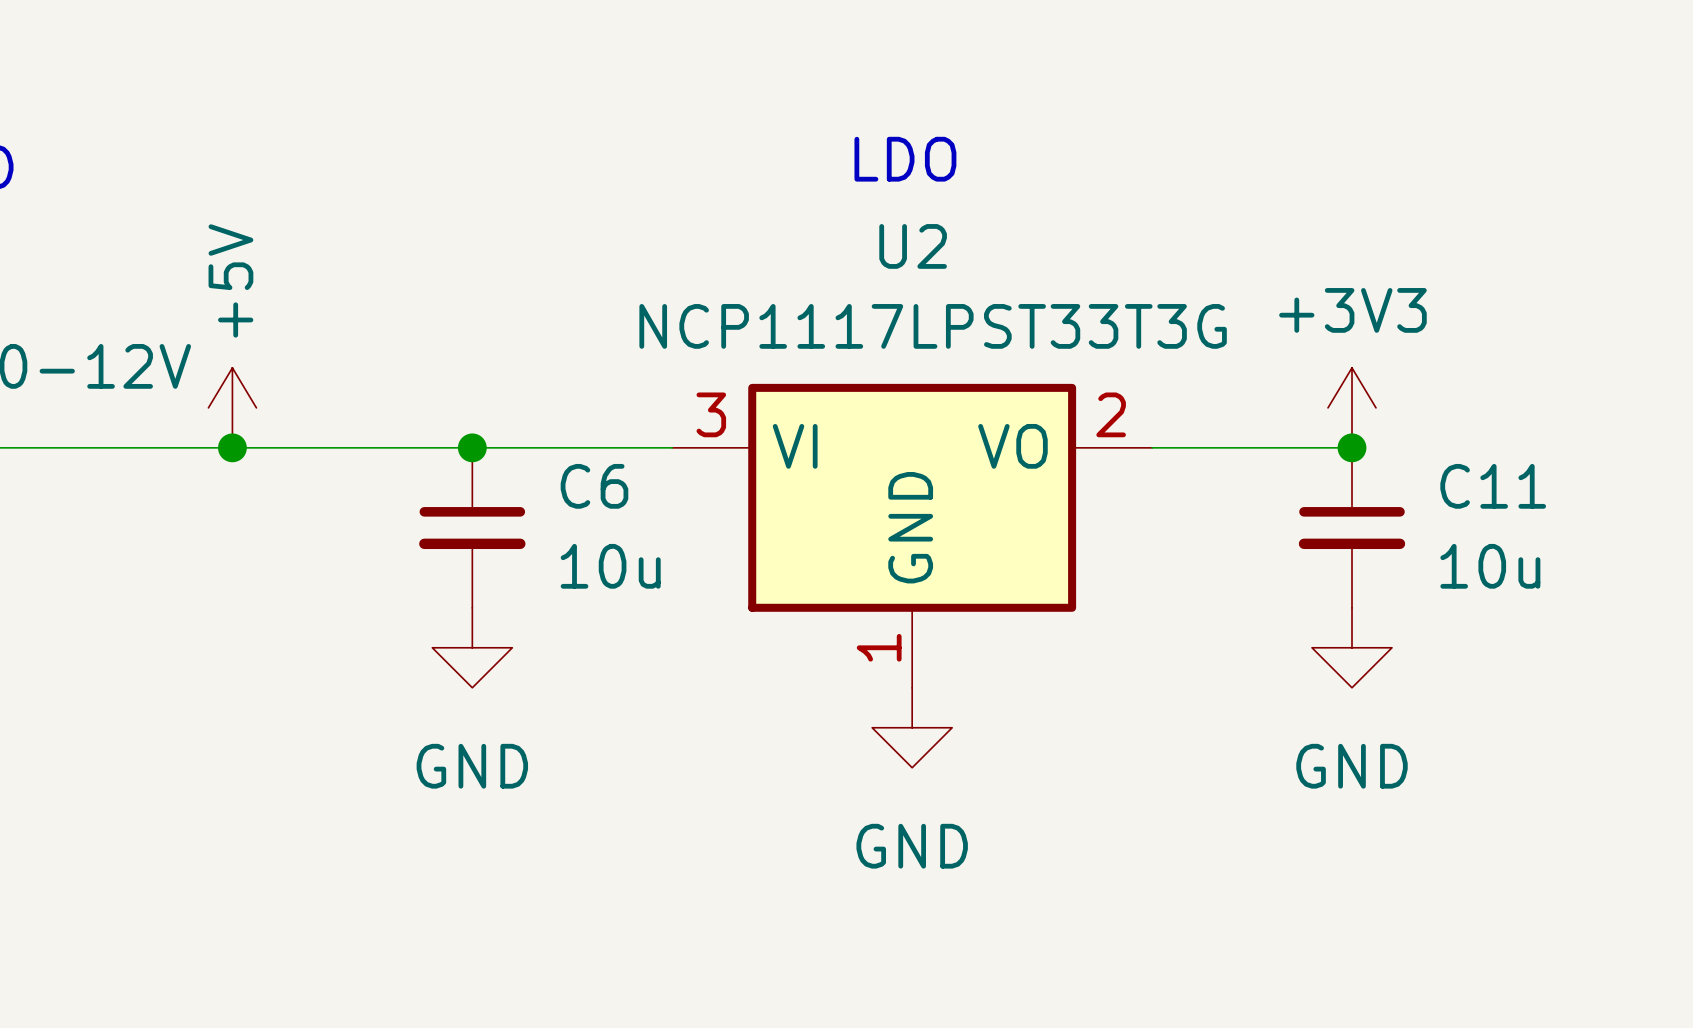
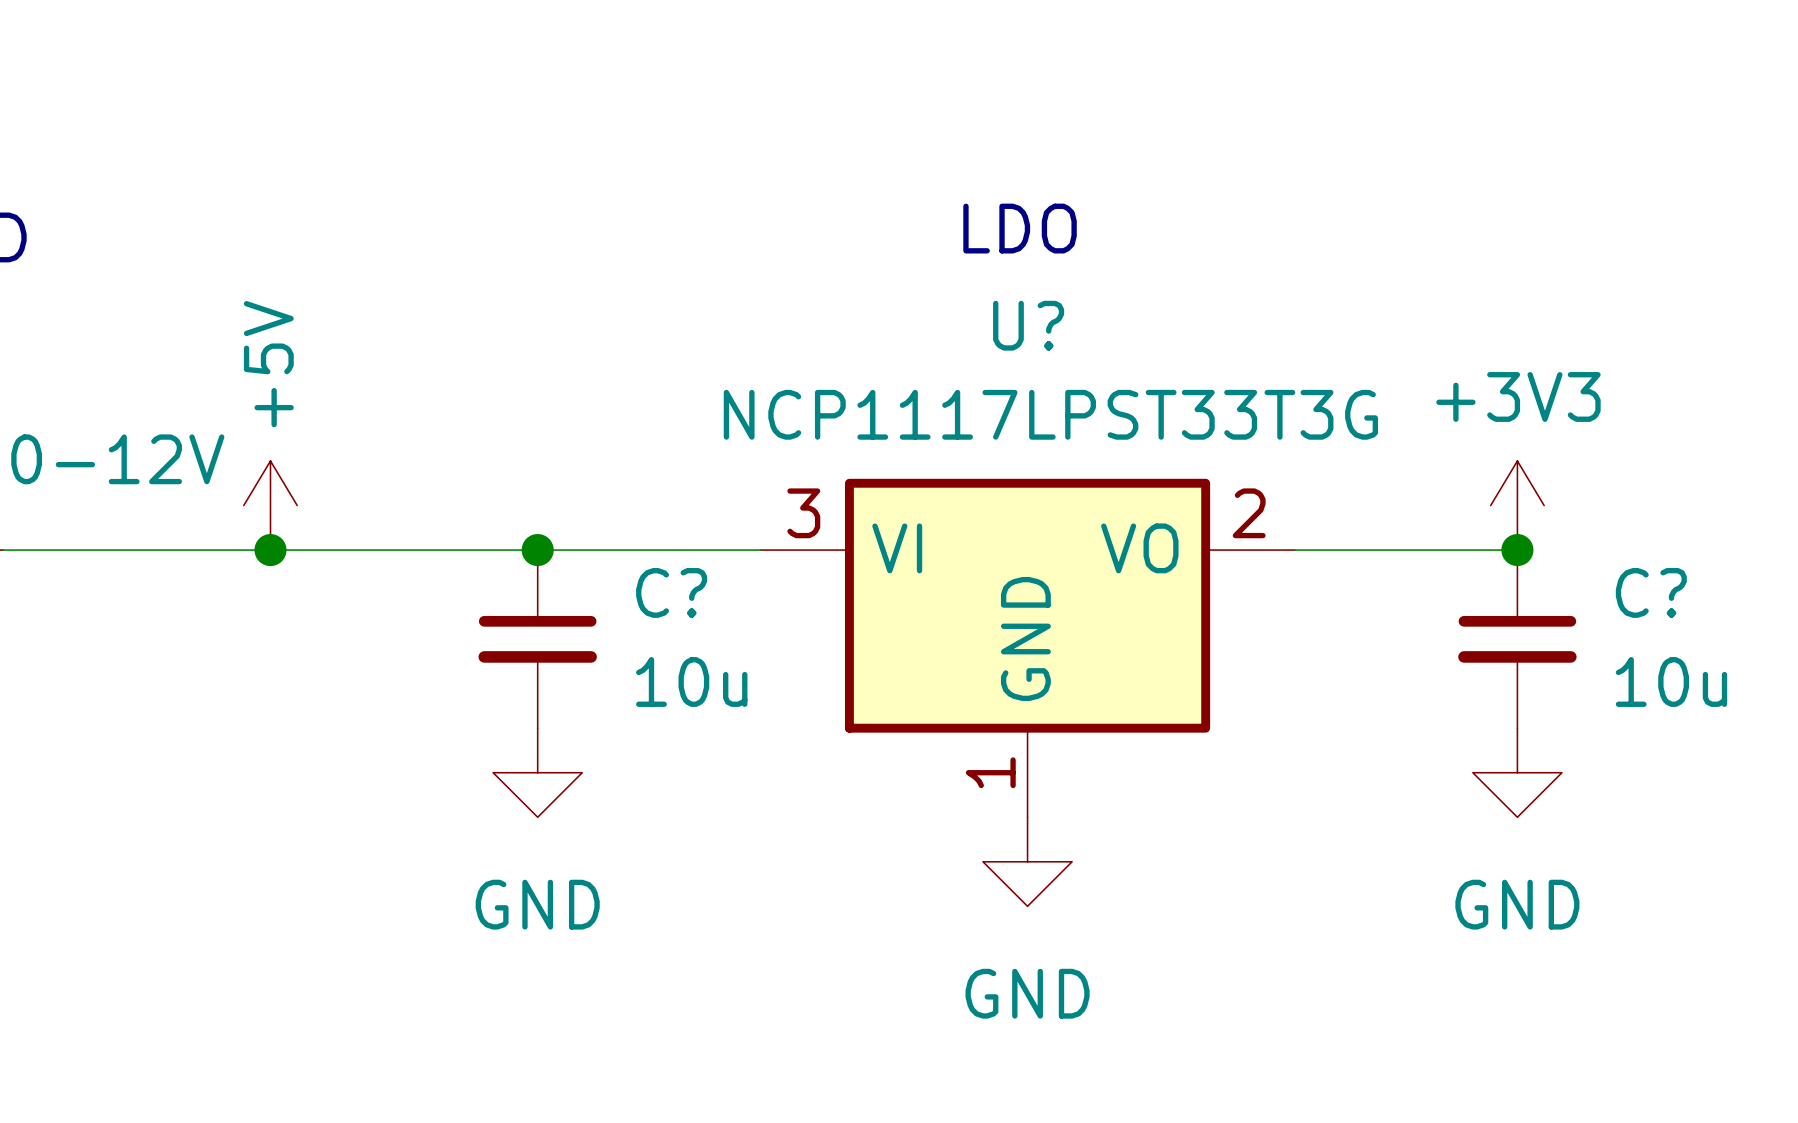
U2 name: U2 (913, 246) -> U? (1028, 325)
C6 name: C6 (594, 486) -> C? (671, 592)
C11 name: C11 (1493, 486) -> C? (1651, 592)

